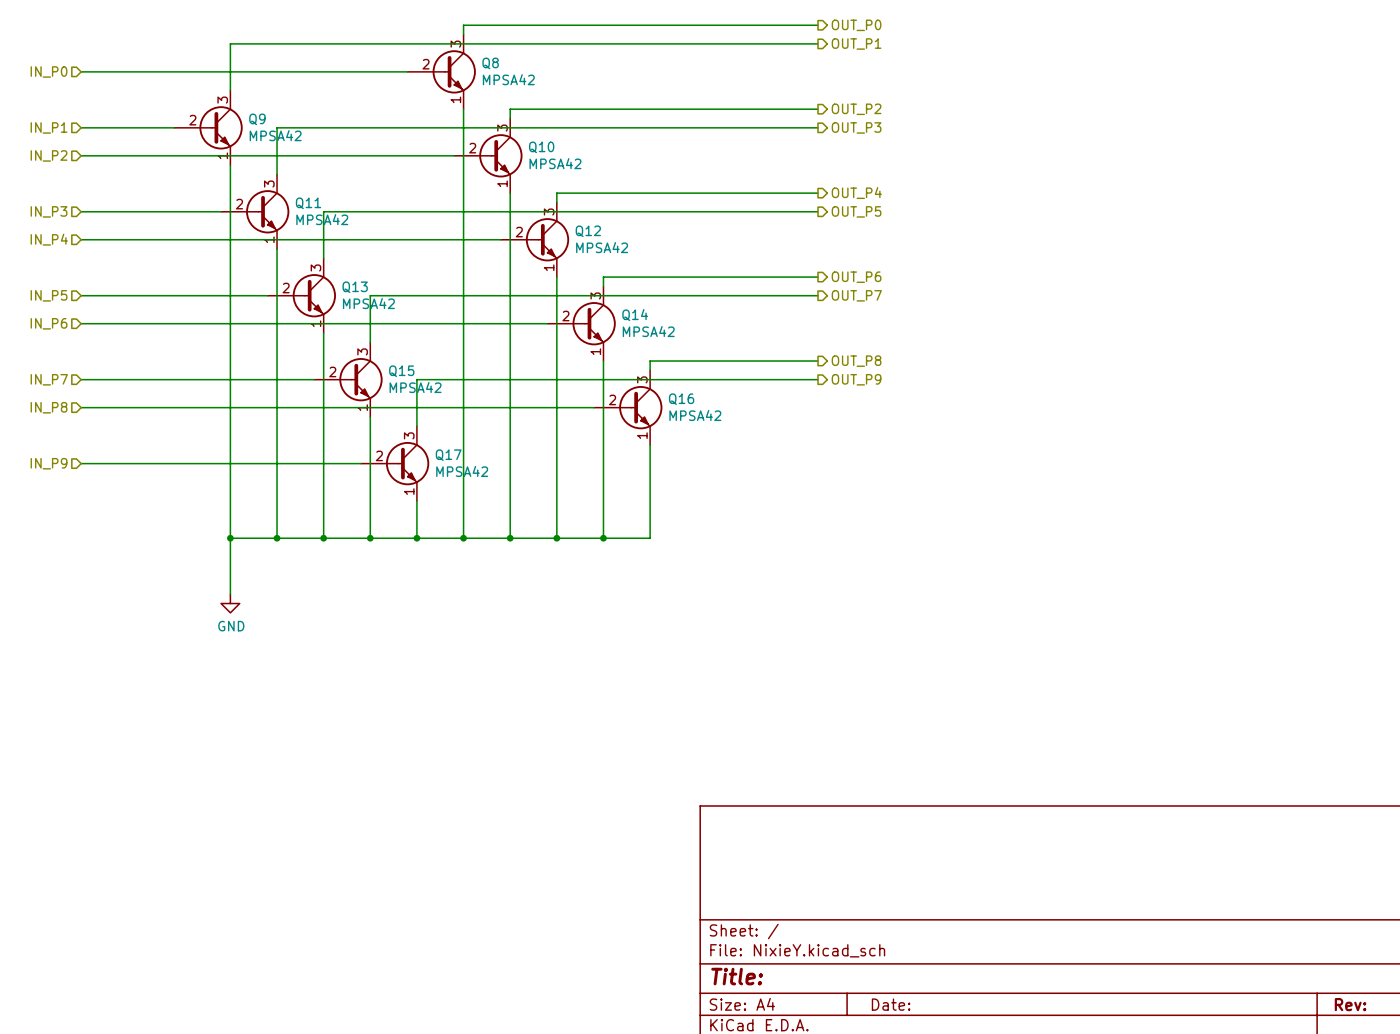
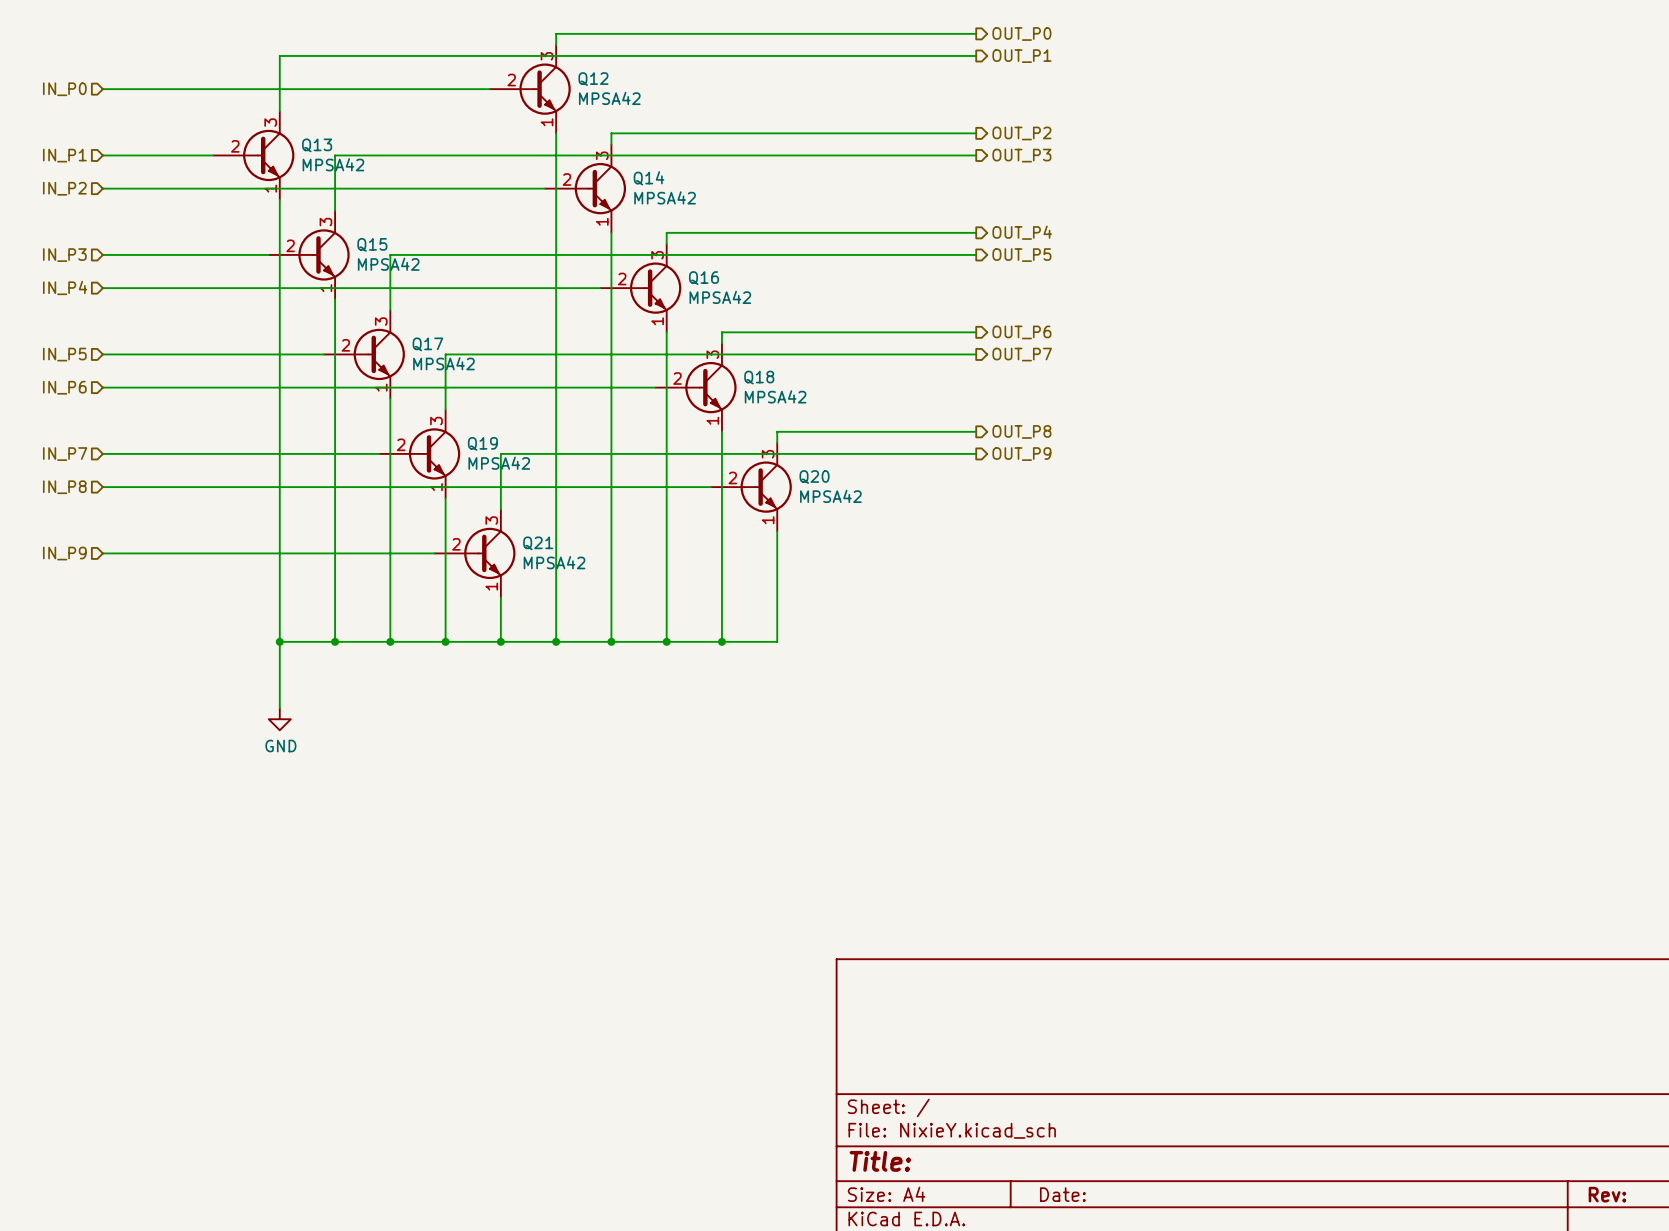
Q8 name: Q8 (490, 63) -> Q12 (593, 79)
Q9 name: Q9 (257, 119) -> Q13 (317, 145)
Q10 name: Q10 (541, 147) -> Q14 (648, 178)
Q11 name: Q11 (308, 203) -> Q15 (372, 244)
Q12 name: Q12 (588, 231) -> Q16 (704, 278)
Q13 name: Q13 (355, 287) -> Q17 (427, 344)
Q14 name: Q14 (635, 315) -> Q18 (759, 377)
Q15 name: Q15 (401, 371) -> Q19 (482, 443)
Q16 name: Q16 (681, 399) -> Q20 (814, 477)
Q17 name: Q17 (448, 455) -> Q21 (538, 543)

